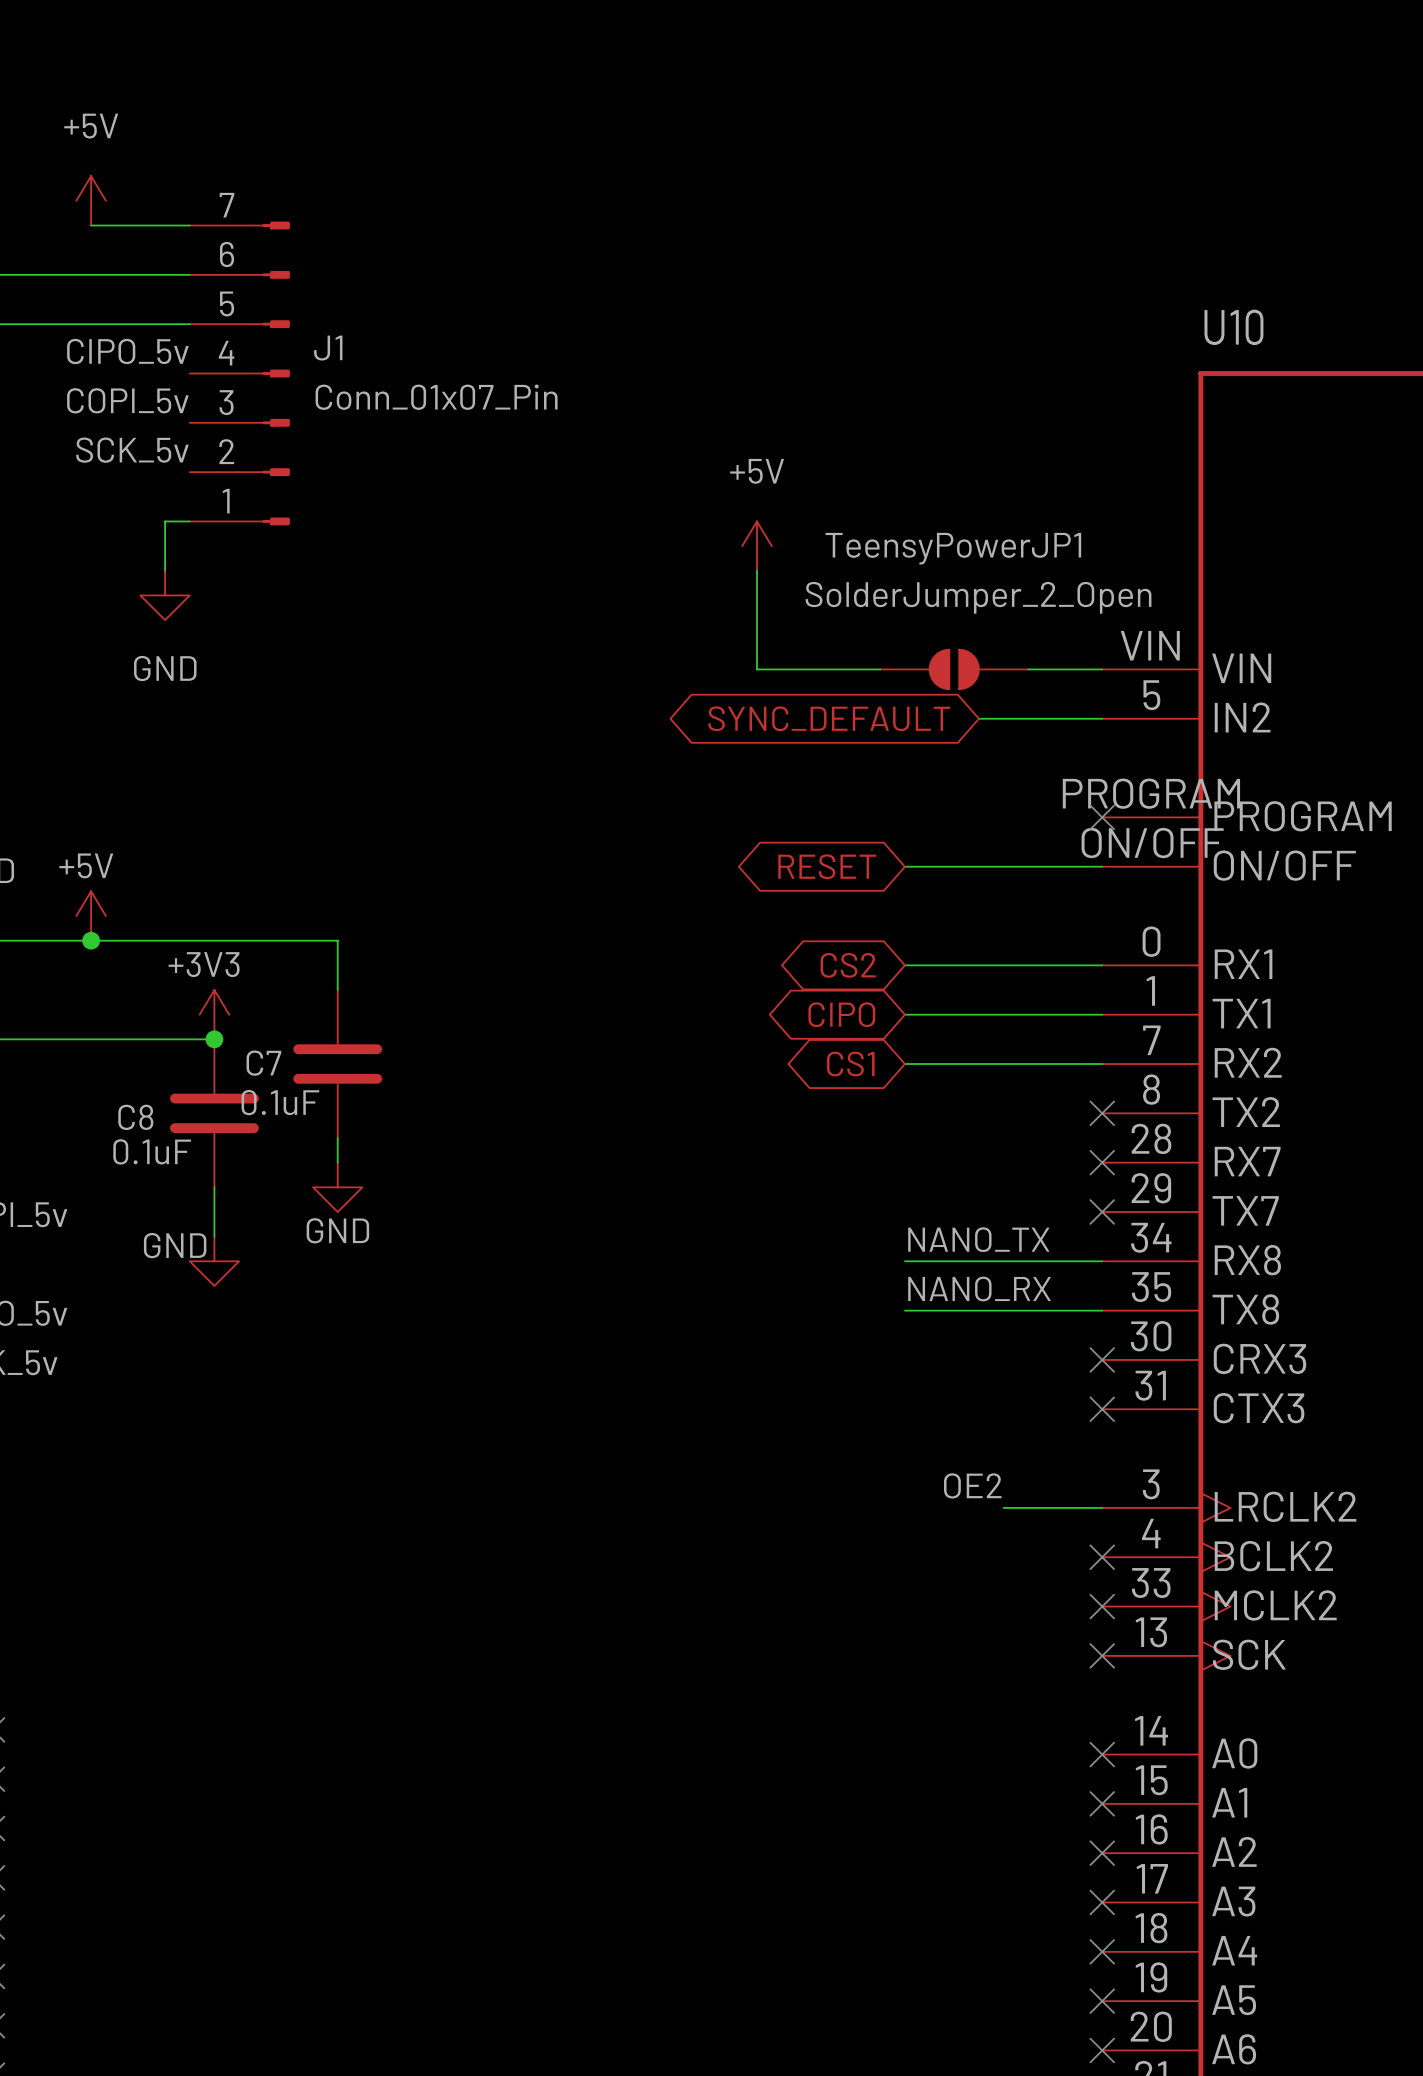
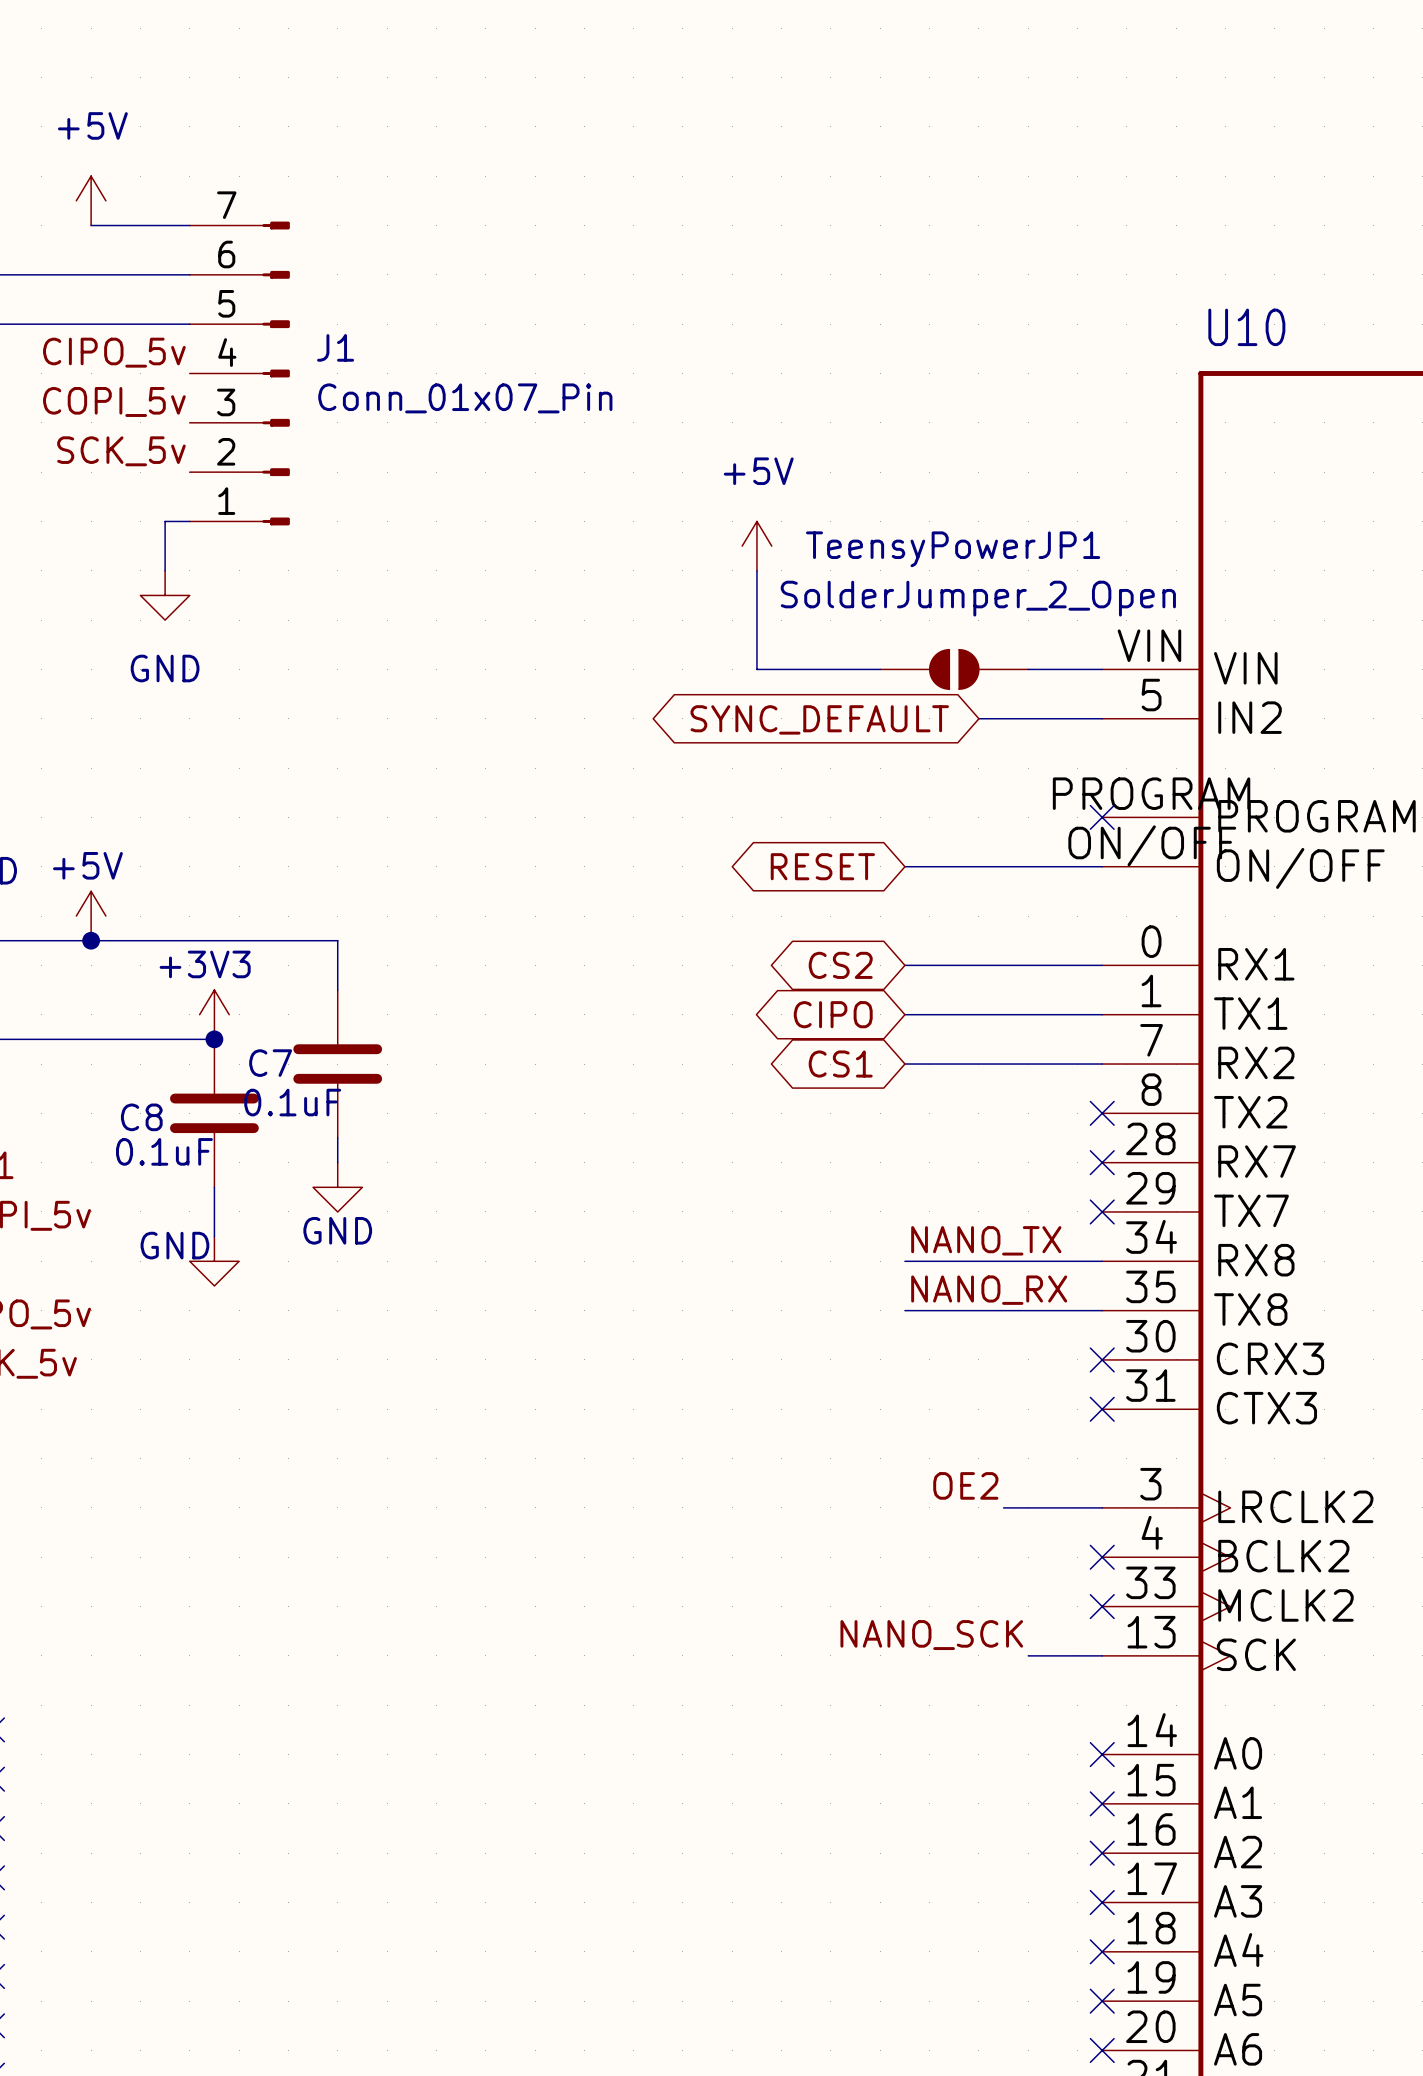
label: none -> NANO_SCK (931, 1635)
wire: none -> (1028, 1655) (1102, 1655)
no-connect mark: (1102, 1655) -> none

